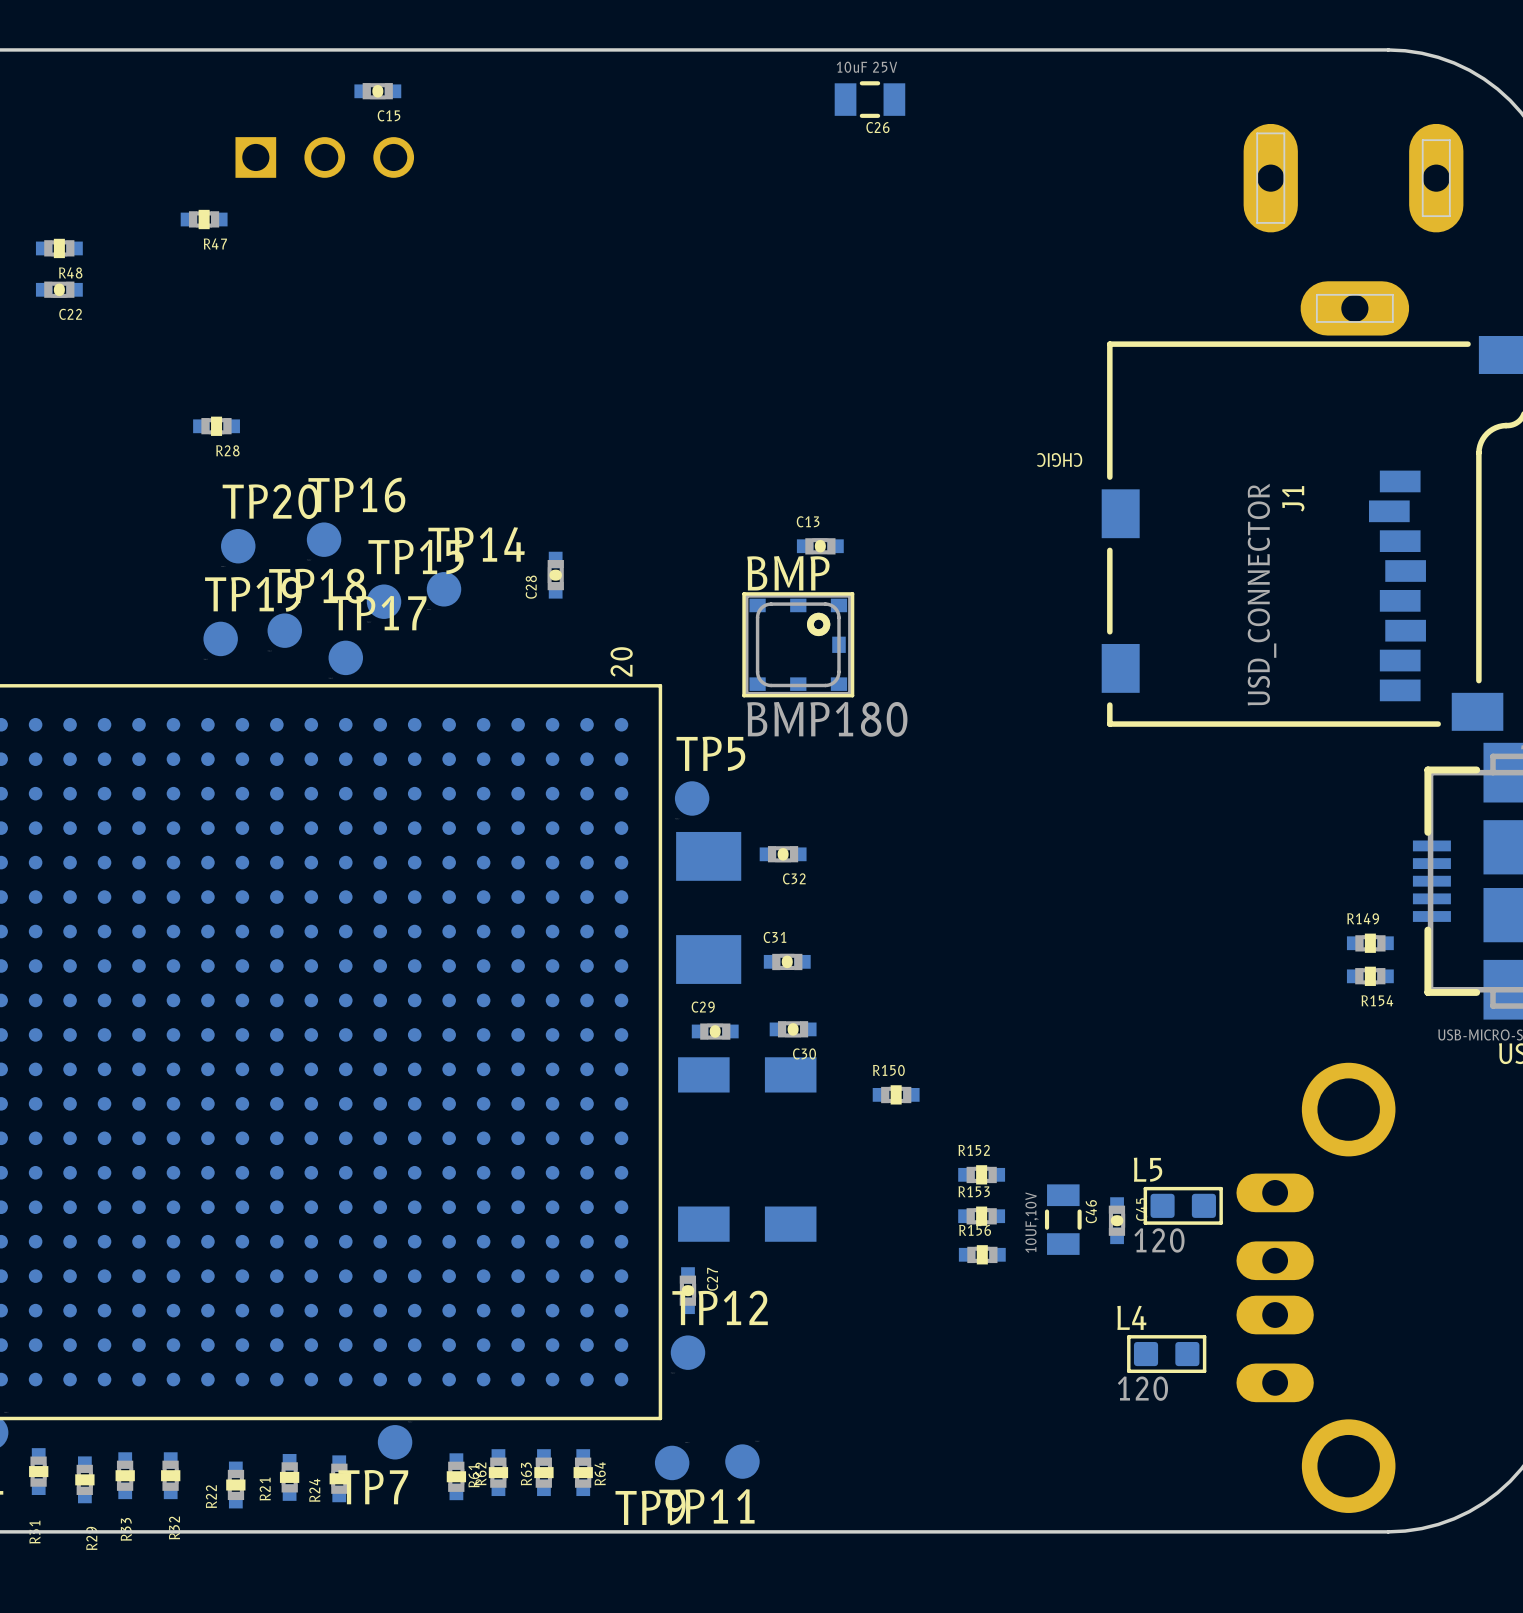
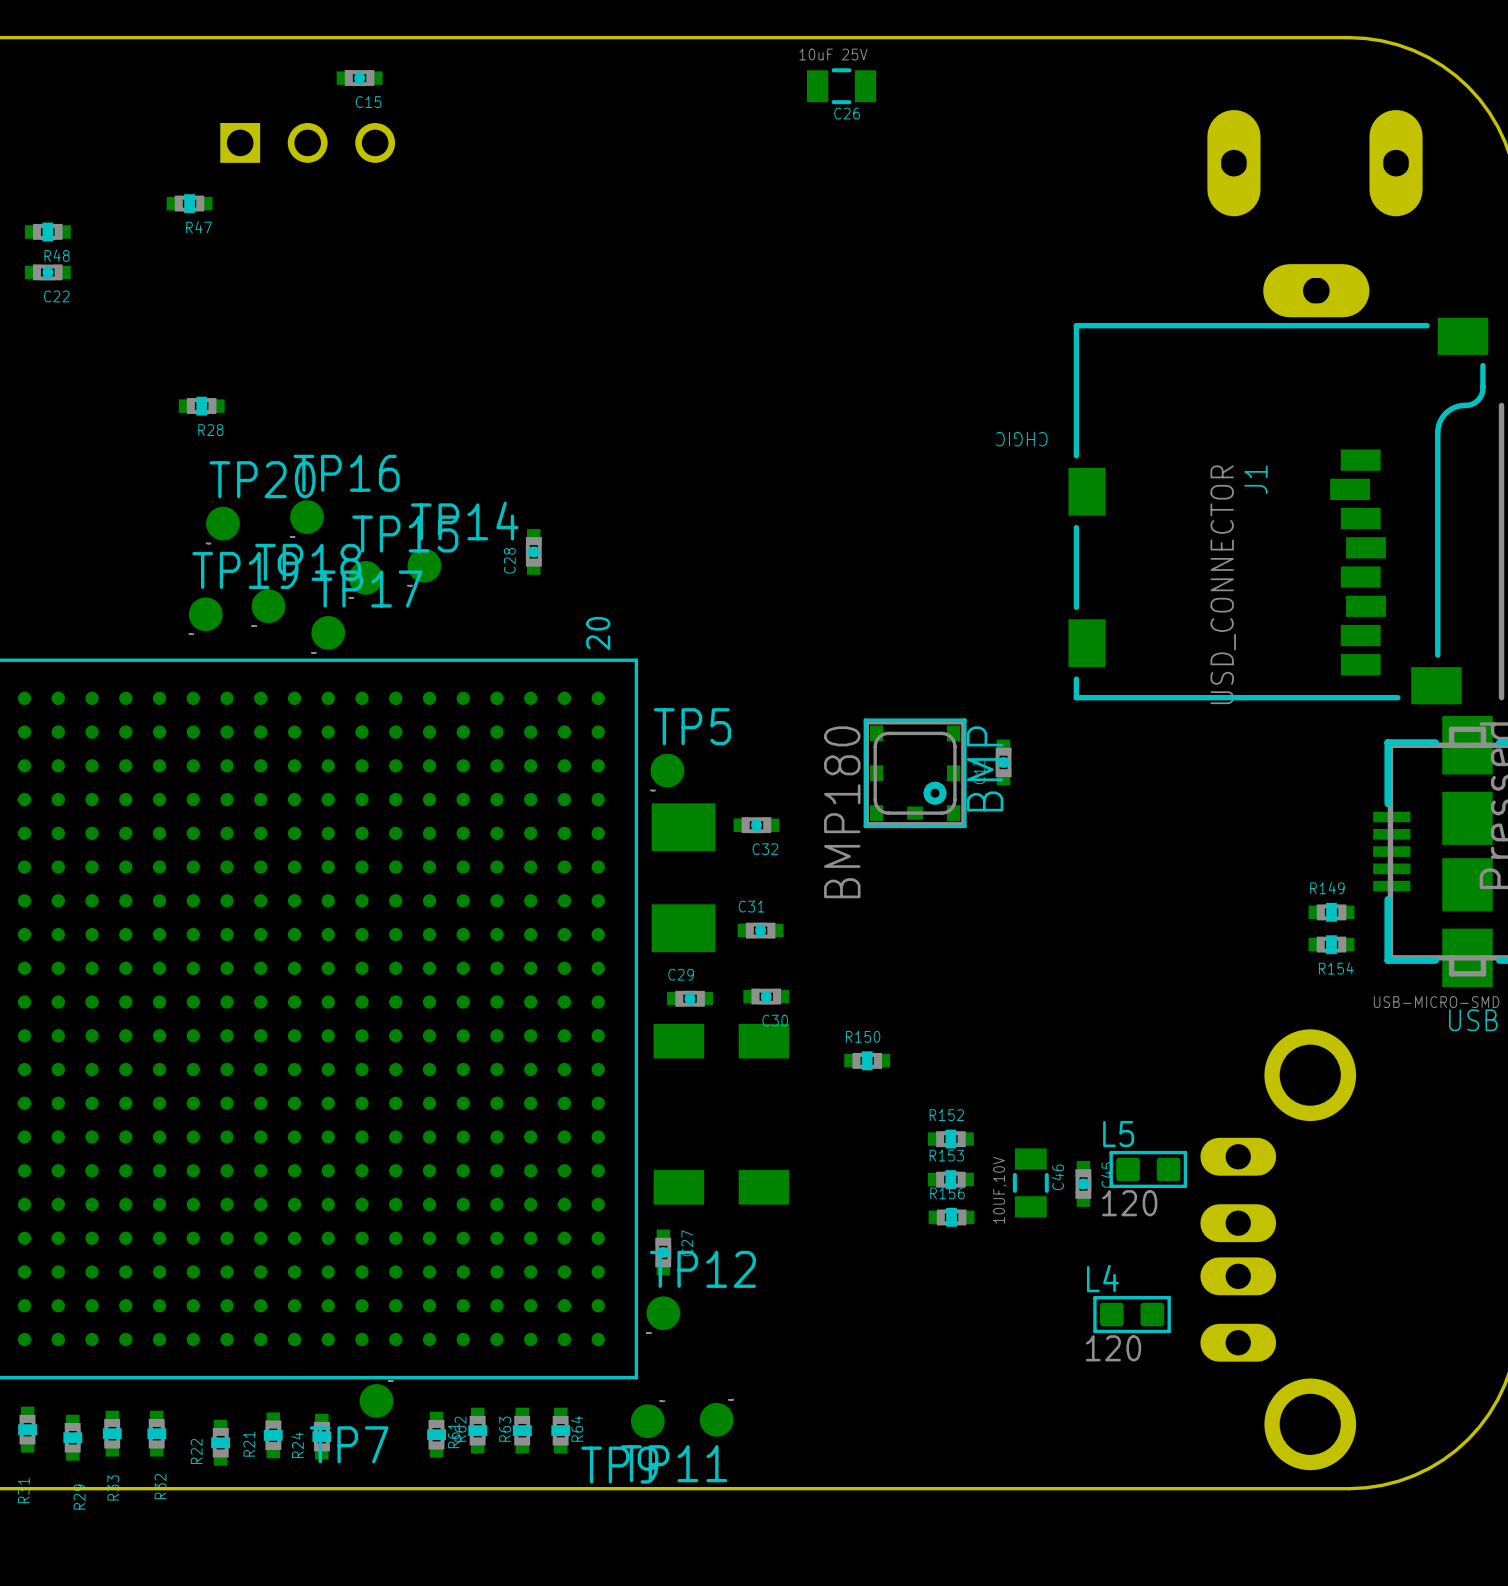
C13 rotation: 0° (820, 546) -> 90° clockwise (1003, 762)
C13 position: (820, 546) -> (1003, 762)
BMP rotation: 0° (798, 644) -> 90° clockwise (915, 773)
BMP position: (798, 644) -> (915, 773)

